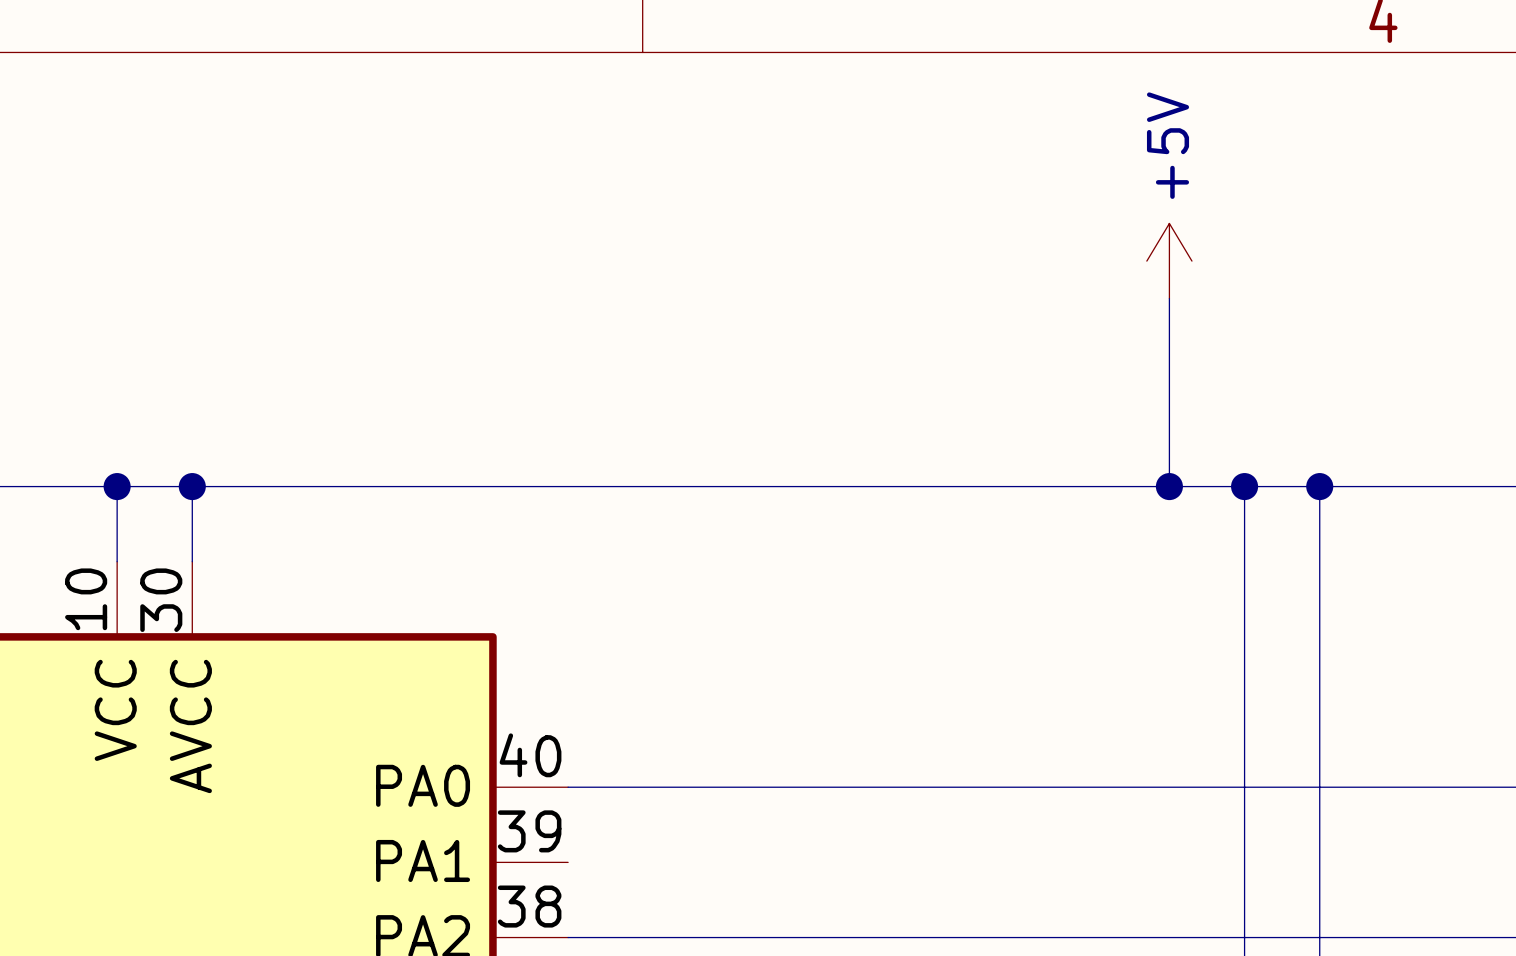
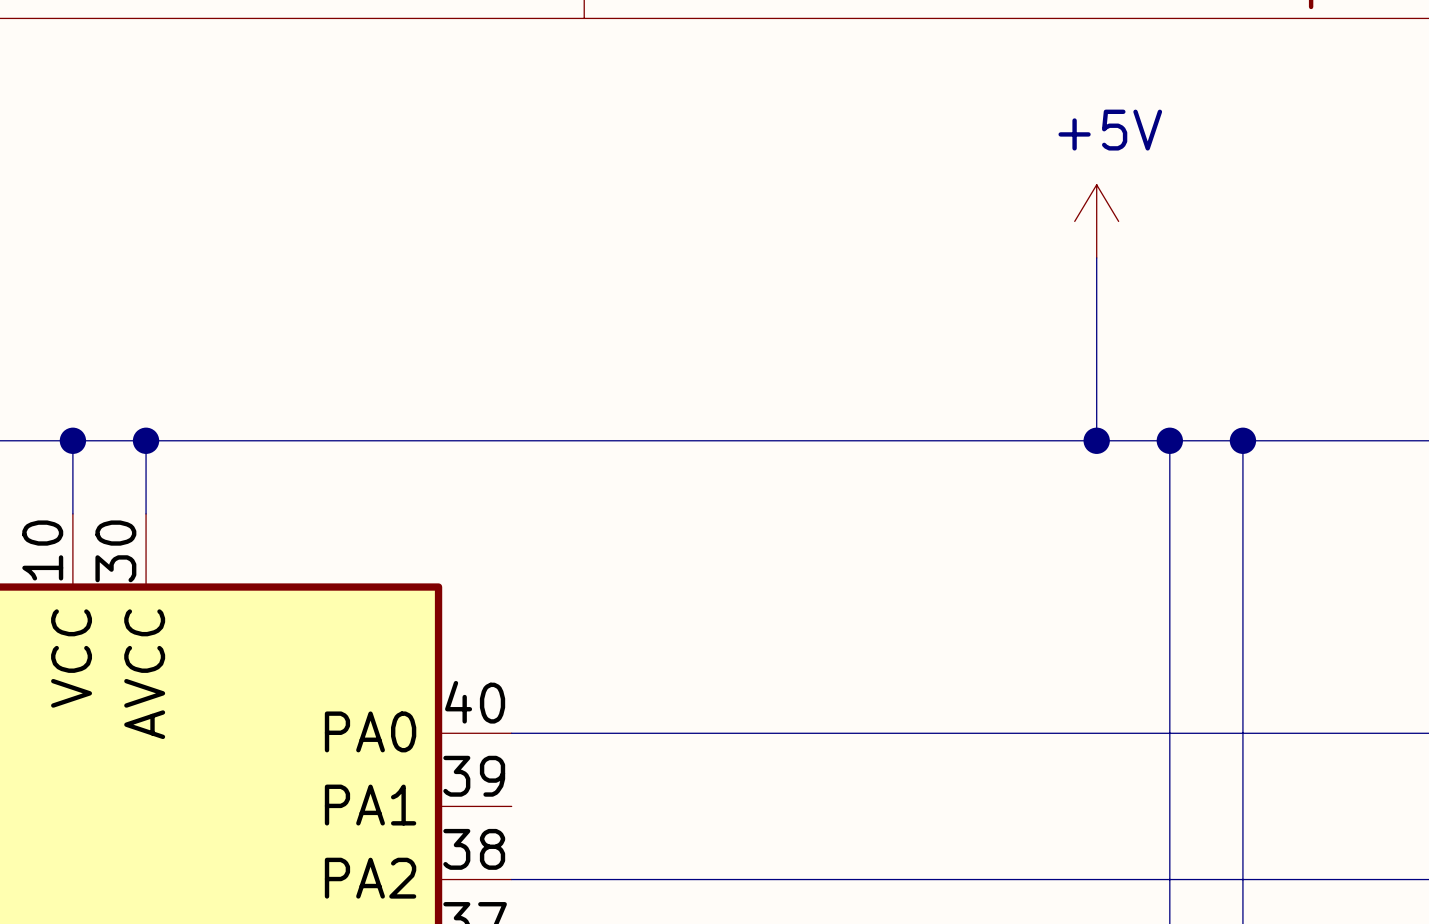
power symbol text rotation: 0° (1168, 145) -> 90° clockwise (1110, 130)

